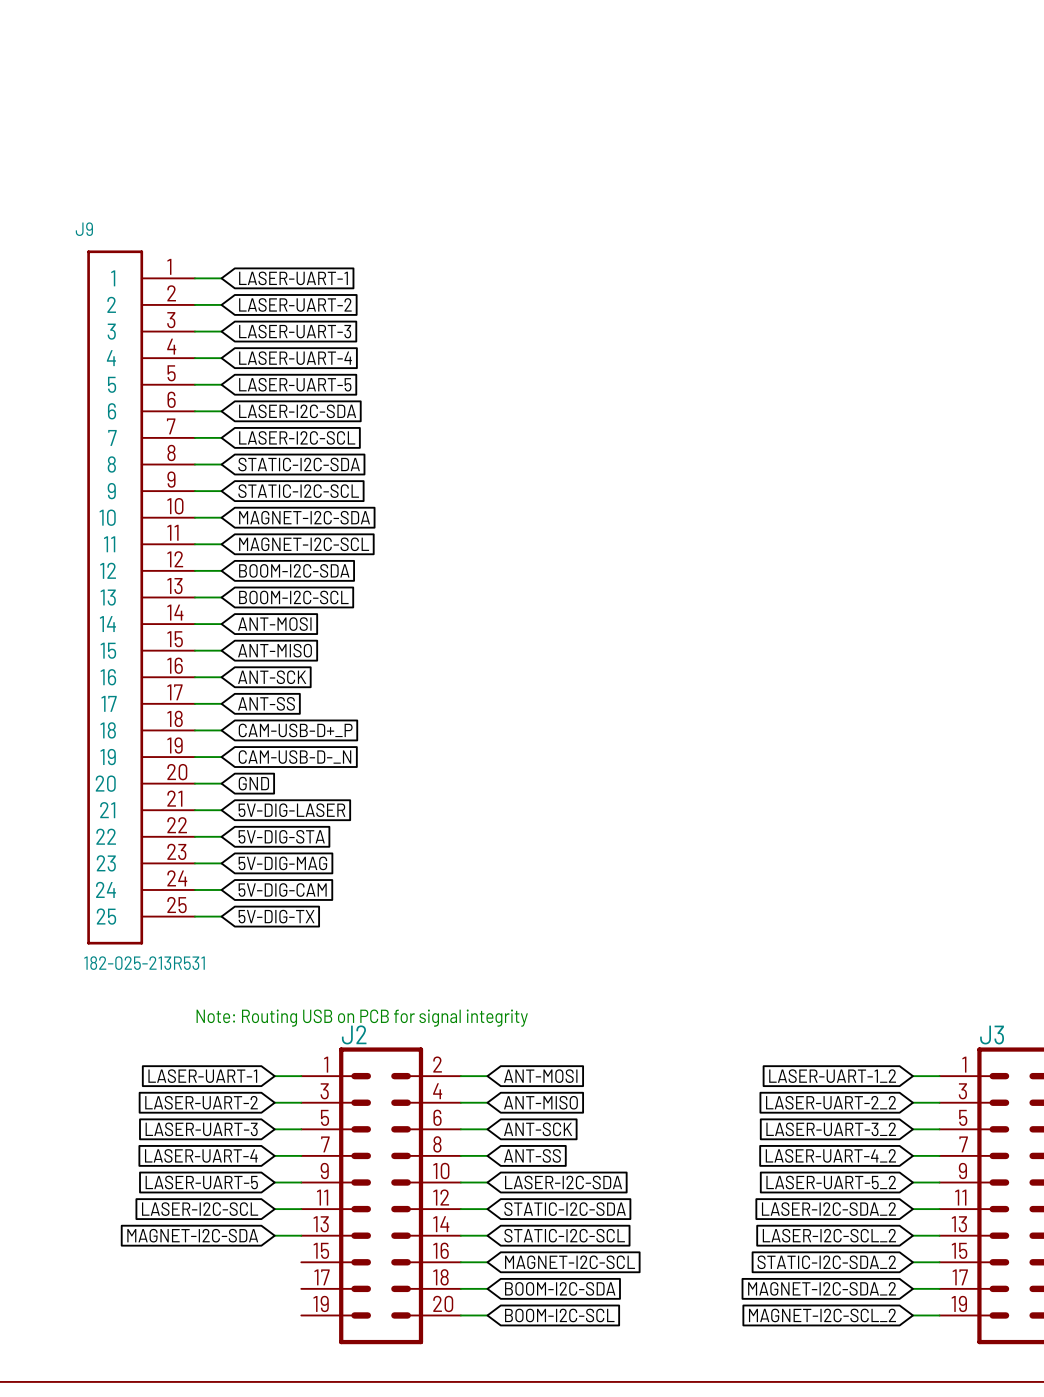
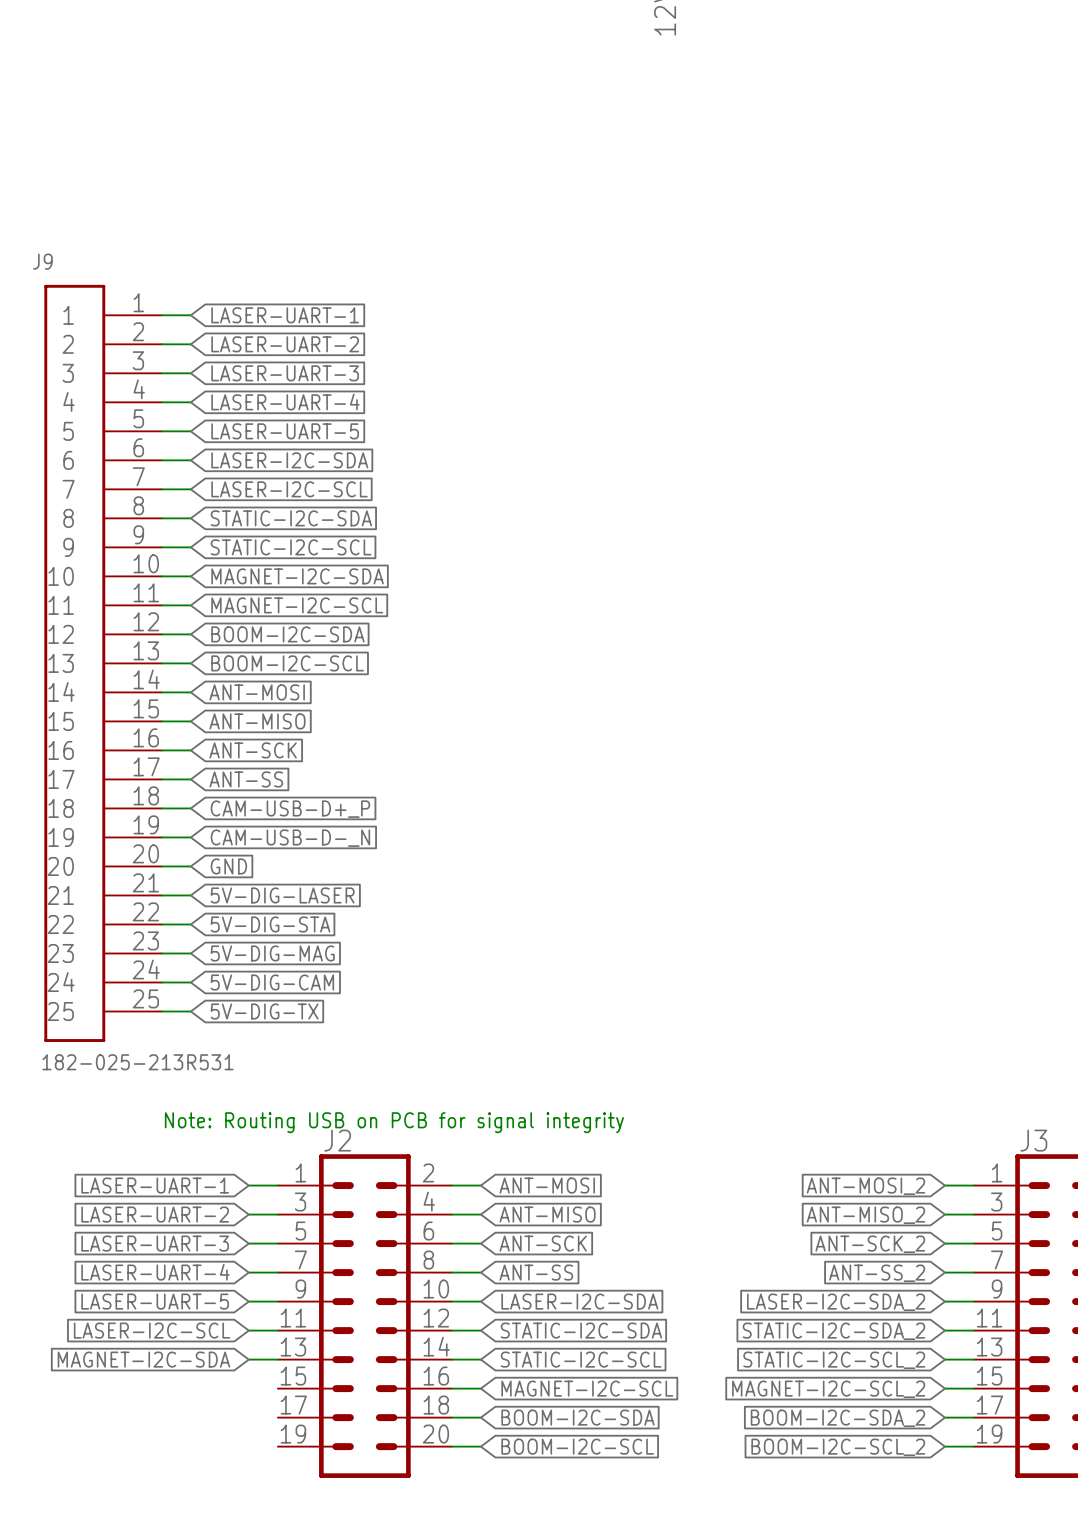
global label: LASER-UART-1_2 (832, 1076) -> ANT-MOSI_2 (865, 1186)
global label: LASER-UART-2_2 (831, 1102) -> ANT-MISO_2 (865, 1215)
global label: LASER-UART-3_2 (831, 1129) -> ANT-SCK_2 (870, 1244)
global label: LASER-UART-4_2 (830, 1155) -> ANT-SS_2 (877, 1273)
global label: LASER-UART-5_2 (831, 1182) -> LASER-I2C-SDA_2 (836, 1302)
global label: LASER-I2C-SDA_2 (828, 1209) -> STATIC-I2C-SDA_2 (833, 1331)
global label: LASER-I2C-SCL_2 (829, 1235) -> STATIC-I2C-SCL_2 (834, 1360)
global label: STATIC-I2C-SDA_2 (826, 1262) -> MAGNET-I2C-SCL_2 (828, 1389)
global label: MAGNET-I2C-SDA_2 (822, 1288) -> BOOM-I2C-SDA_2 (837, 1418)
global label: MAGNET-I2C-SCL_2 (822, 1315) -> BOOM-I2C-SCL_2 (838, 1447)

